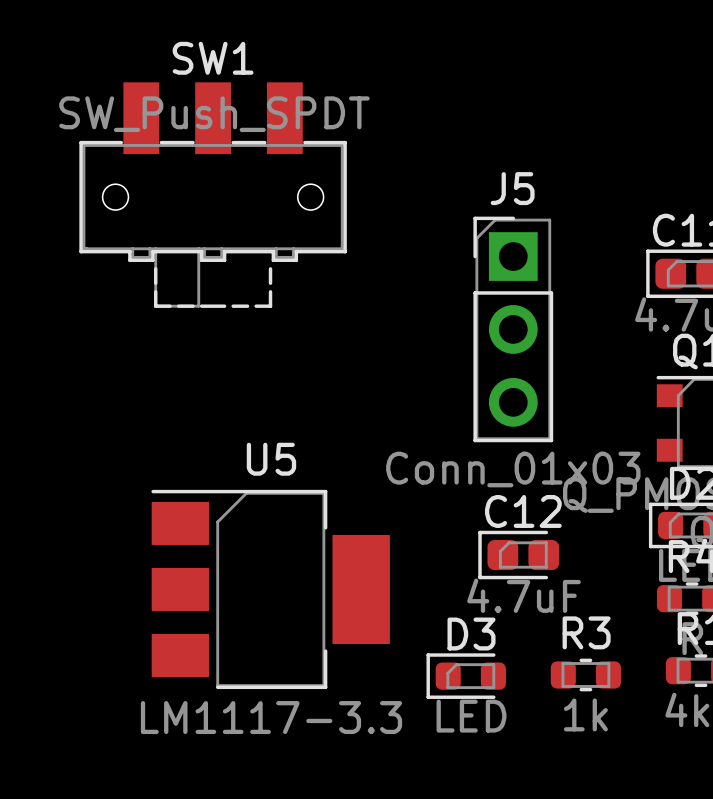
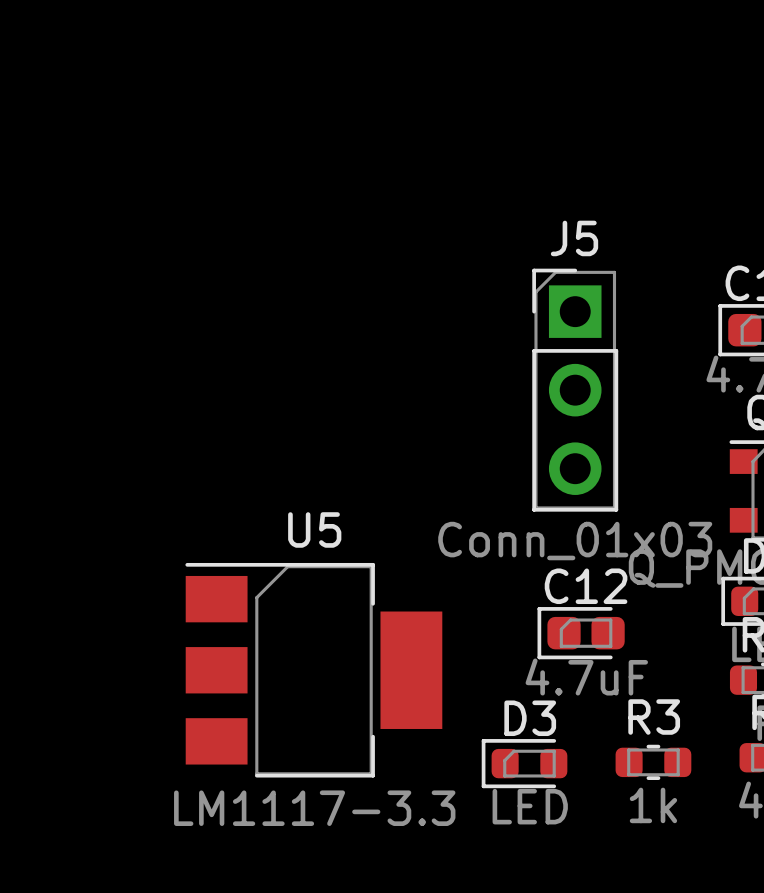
SW1: SW_Push_SPDT (213, 195) -> none

